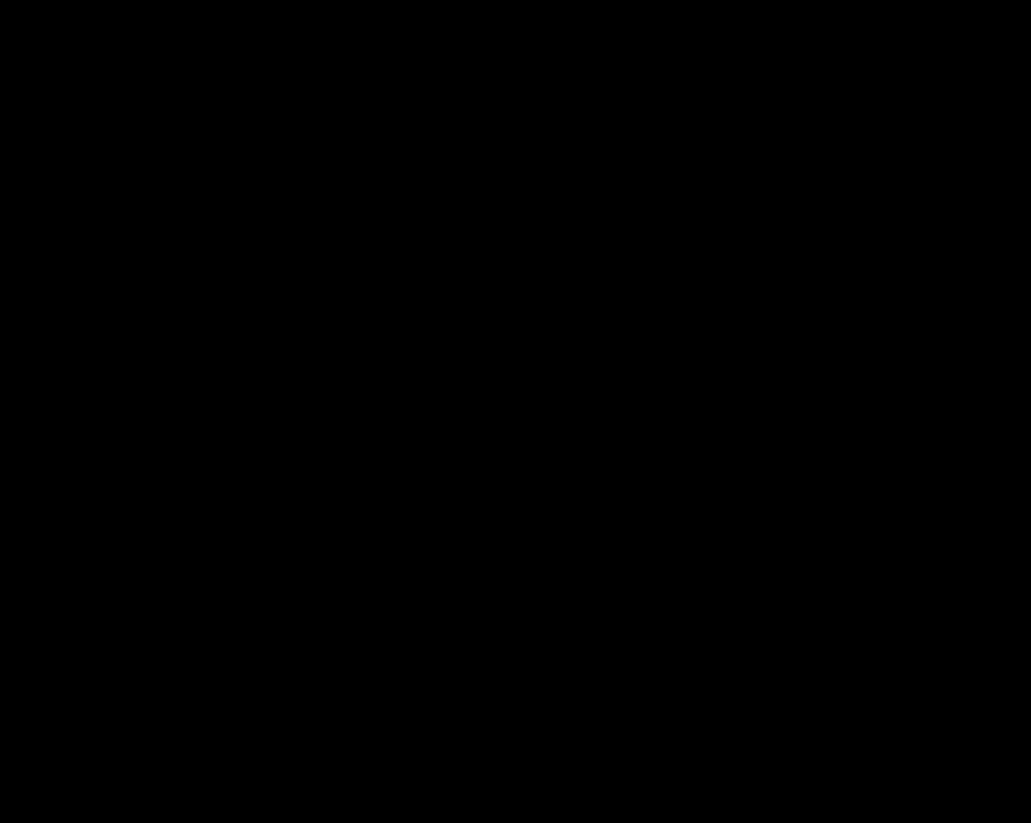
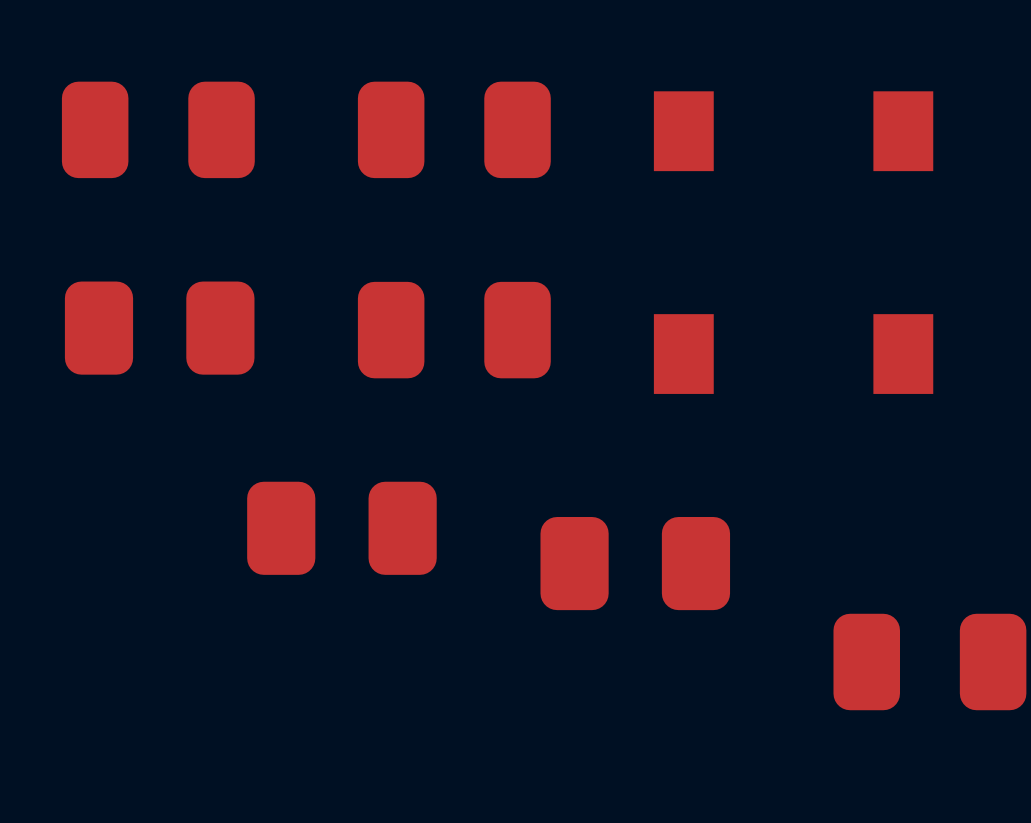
part: none -> (158, 129)
part: none -> (454, 129)
part: none -> (793, 131)
part: none -> (159, 328)
part: none -> (454, 330)
part: none -> (793, 354)
part: none -> (341, 528)
part: none -> (635, 563)
part: none -> (929, 662)

